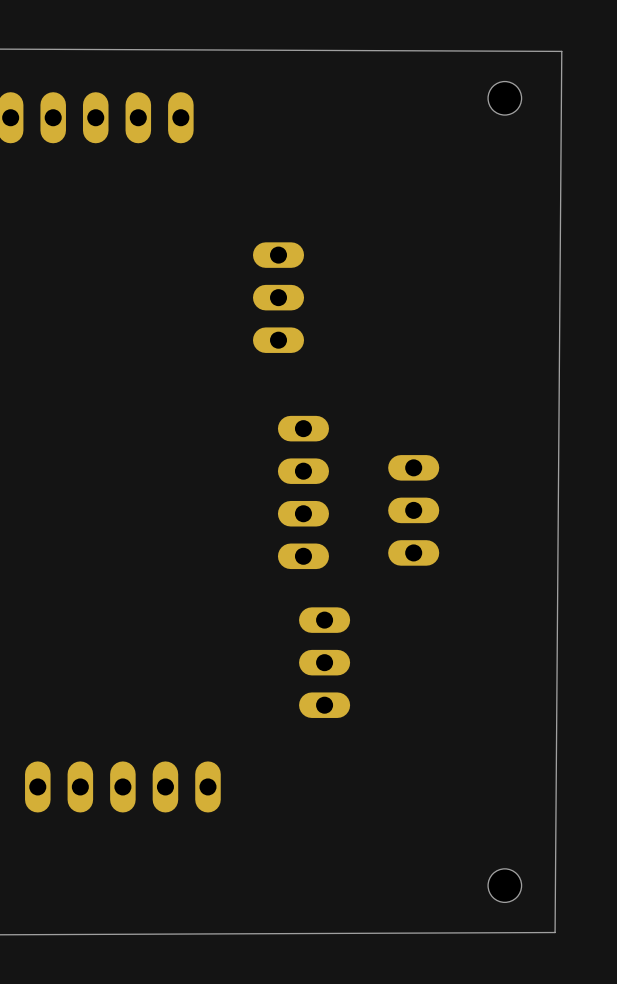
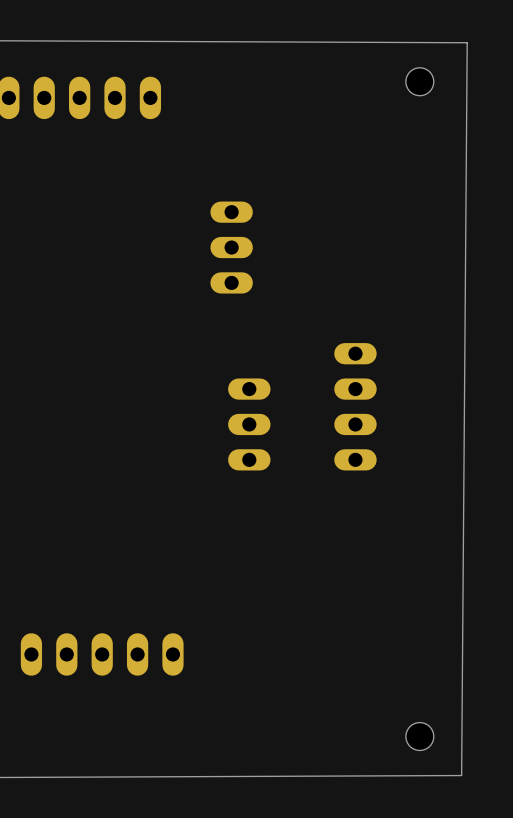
part position: (303, 492) -> (355, 406)
part: none -> (249, 424)
part: (413, 510) -> none
part: (324, 662) -> none

